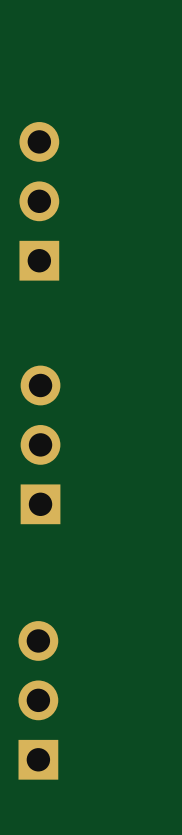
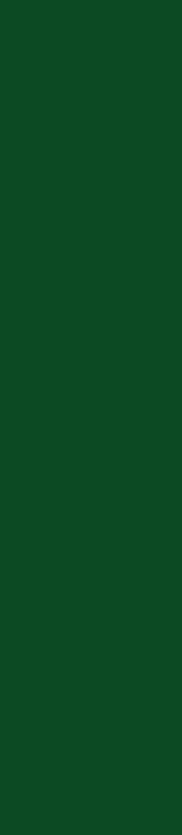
part: (39, 201) -> none
part: (40, 444) -> none
part: (38, 700) -> none

